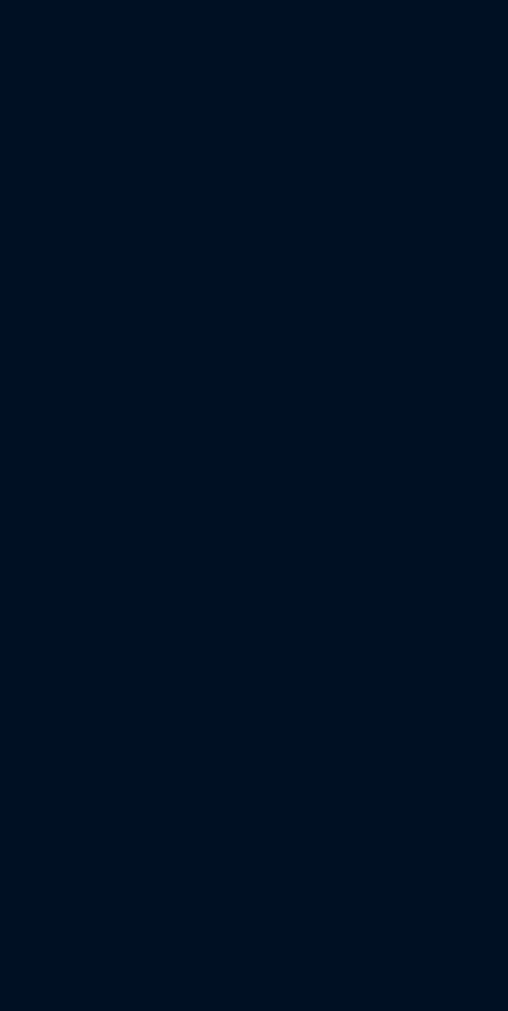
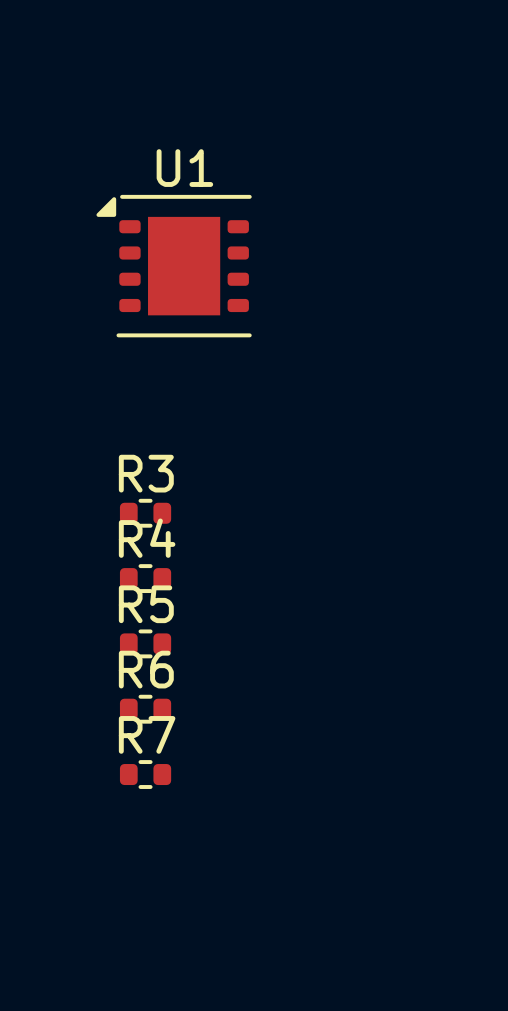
U1: none -> (174, 266)
R3: none -> (145, 513)
R4: none -> (145, 578)
R5: none -> (145, 643)
R6: none -> (145, 709)
R7: none -> (145, 774)

